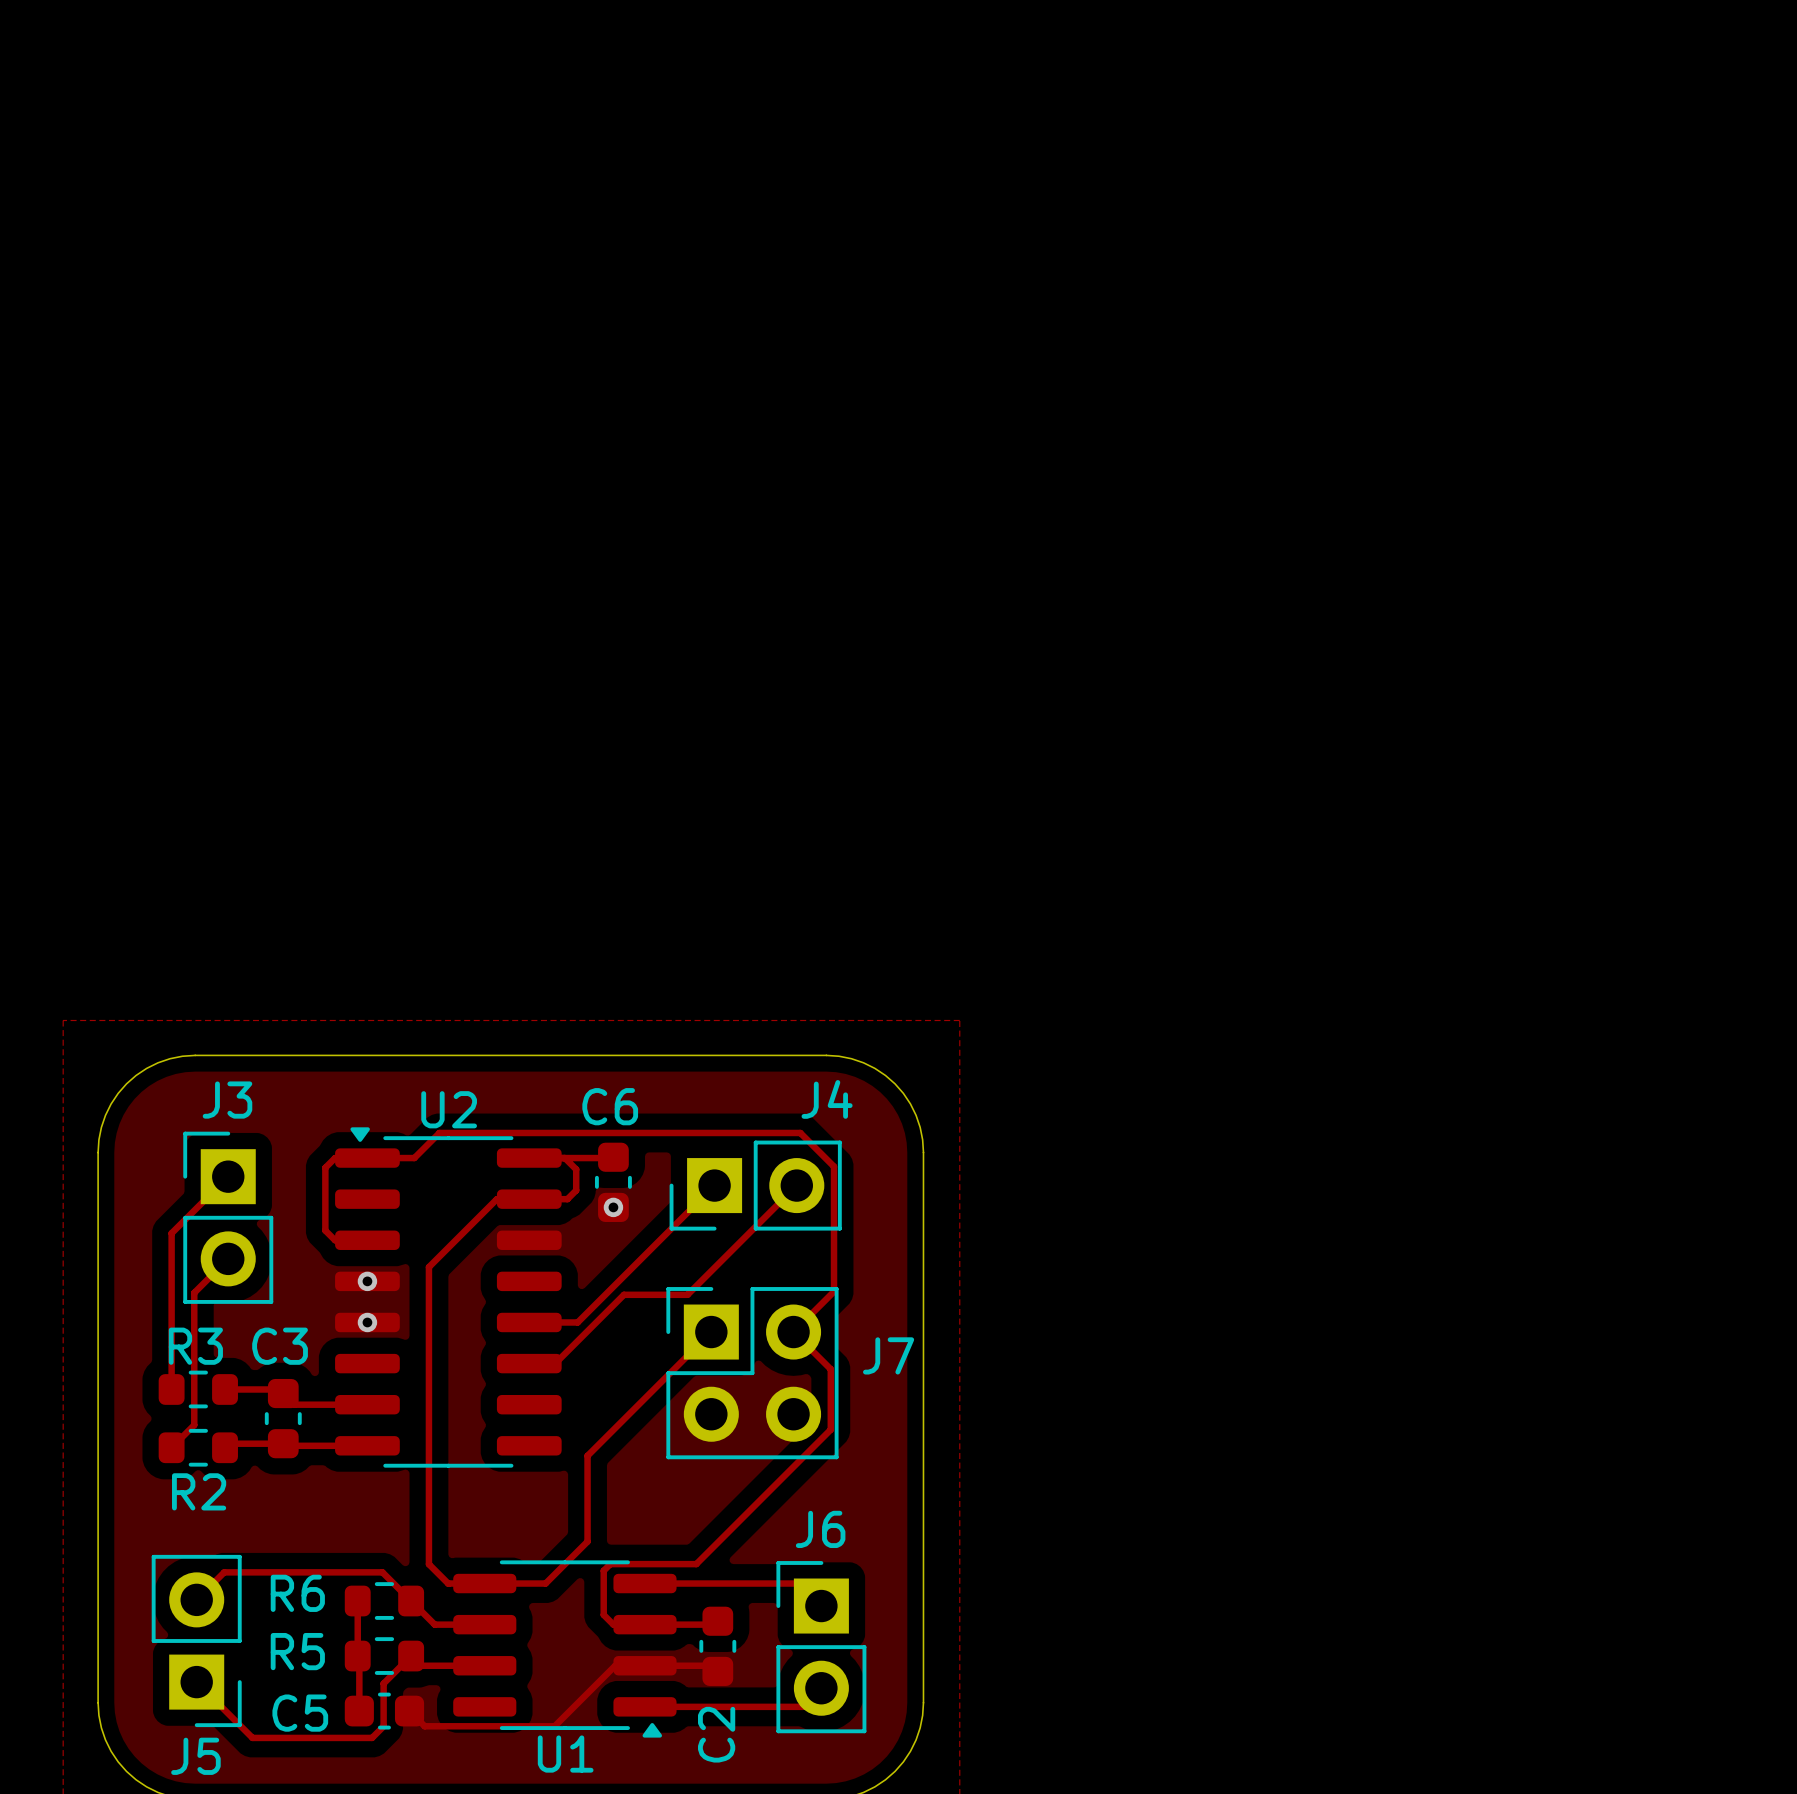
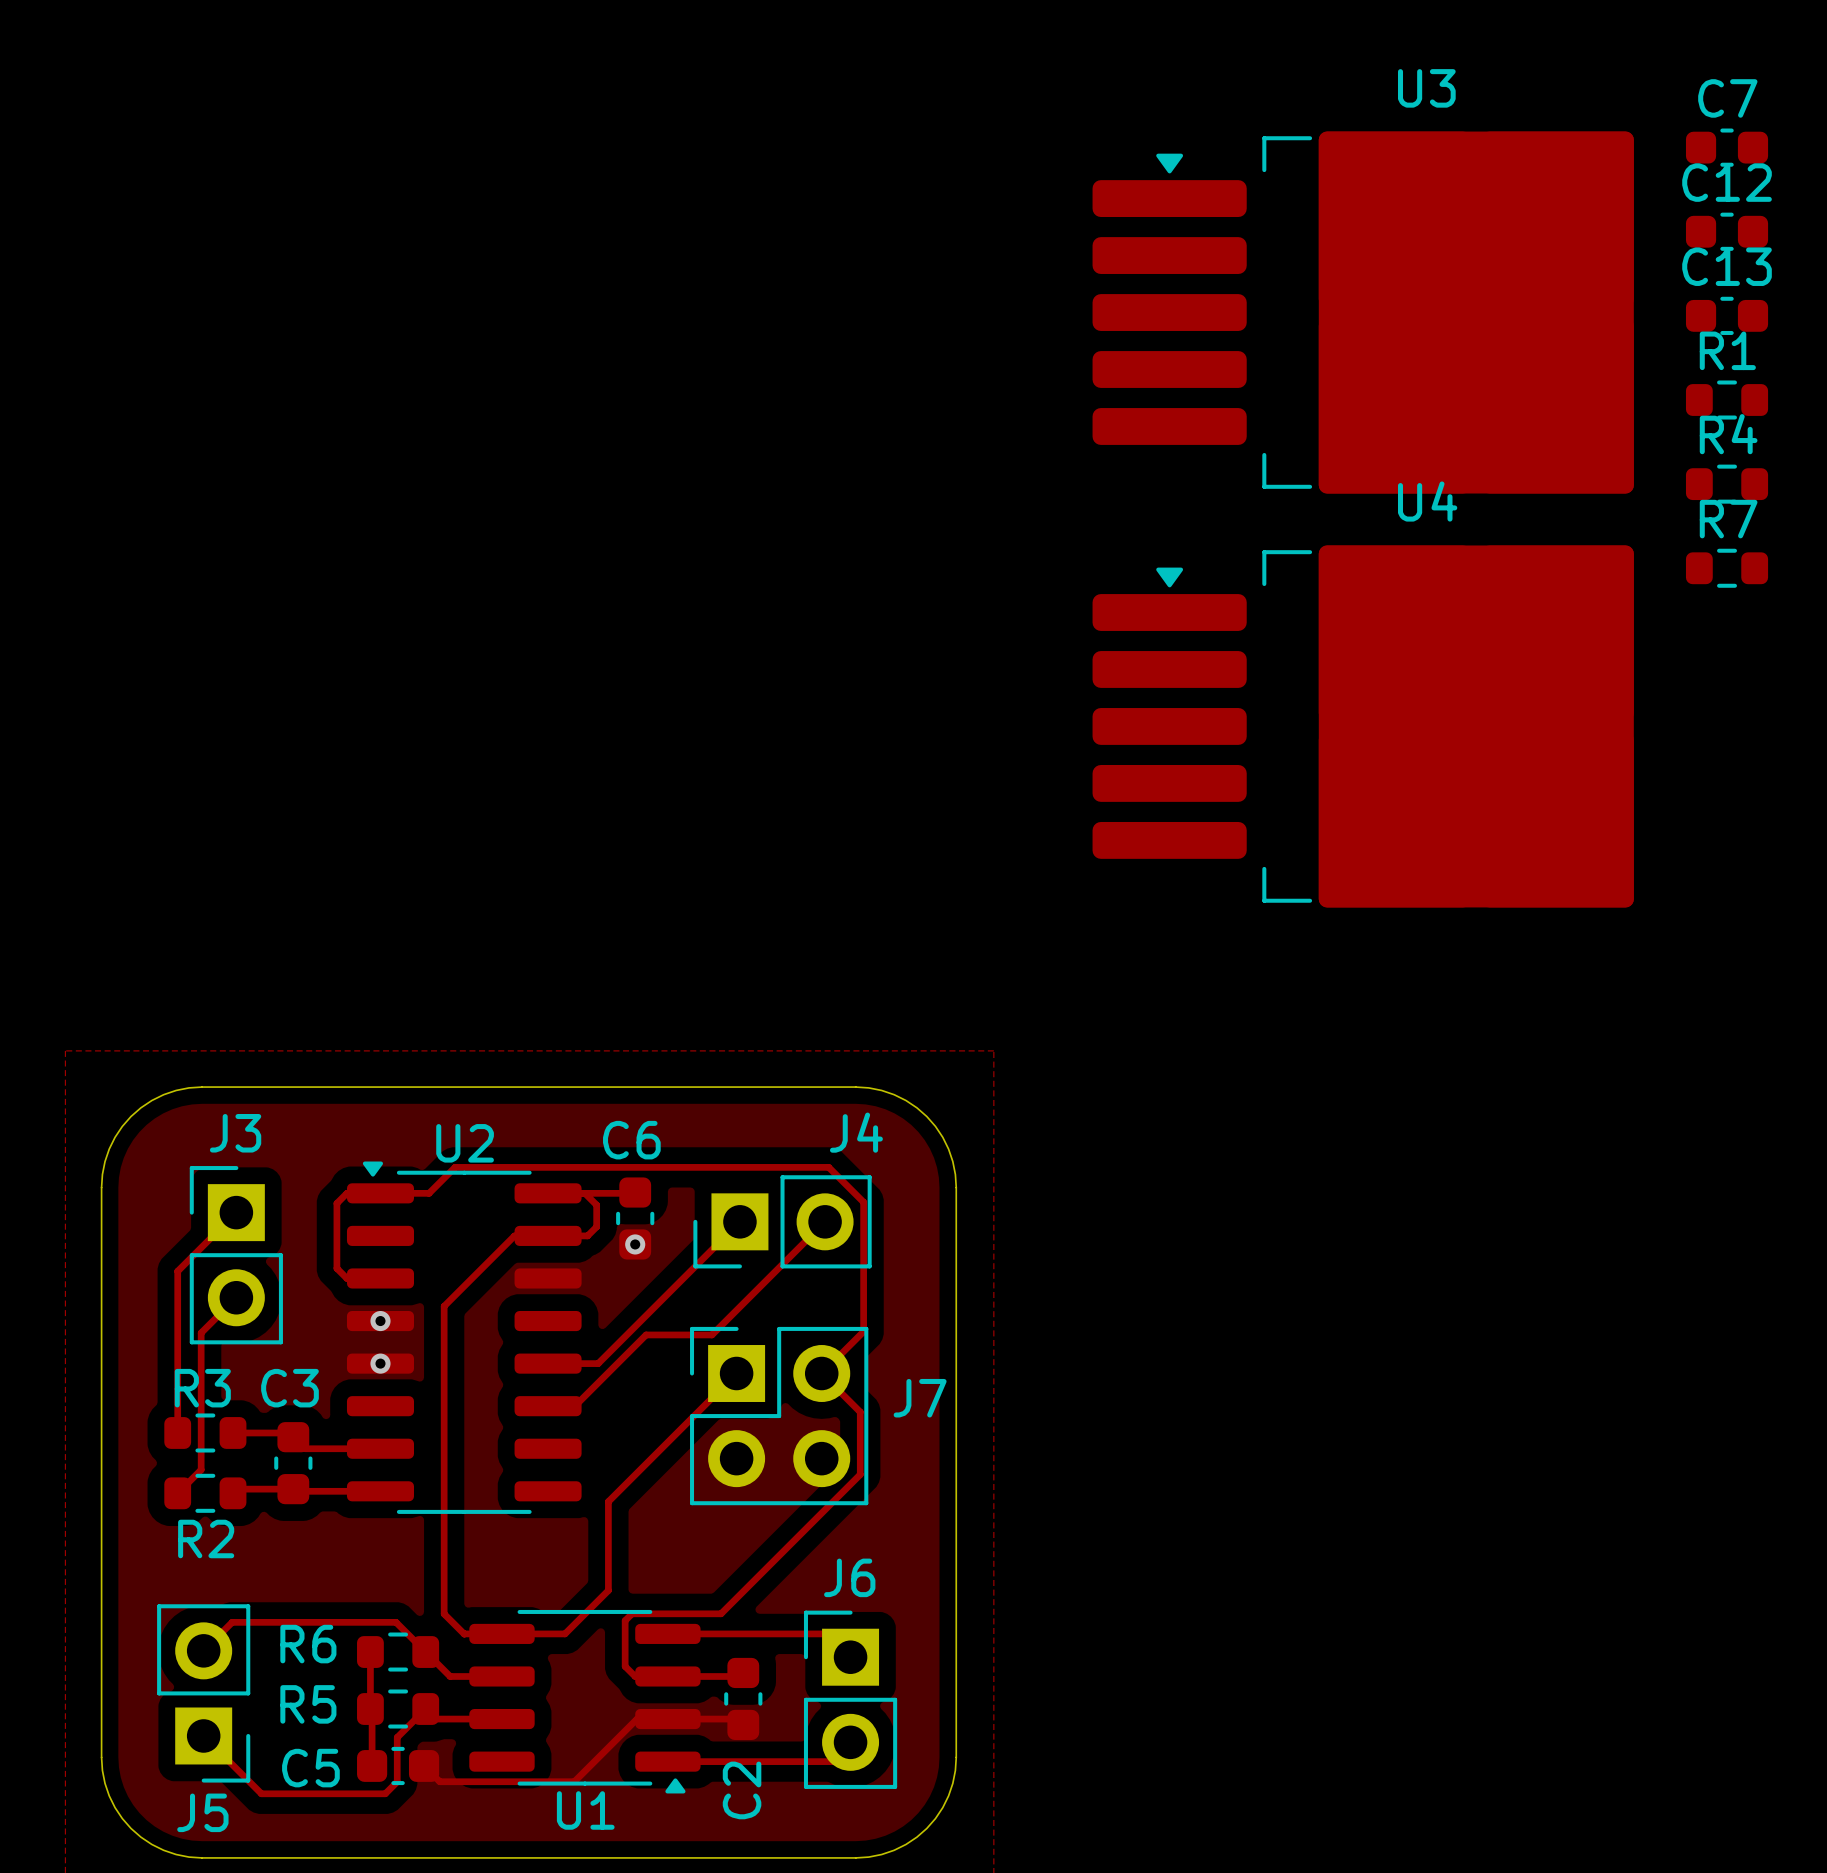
C7: none -> (1727, 147)
C12: none -> (1727, 231)
U3: none -> (1363, 312)
C13: none -> (1727, 315)
R1: none -> (1727, 400)
R4: none -> (1727, 484)
R7: none -> (1727, 568)
U4: none -> (1363, 726)

